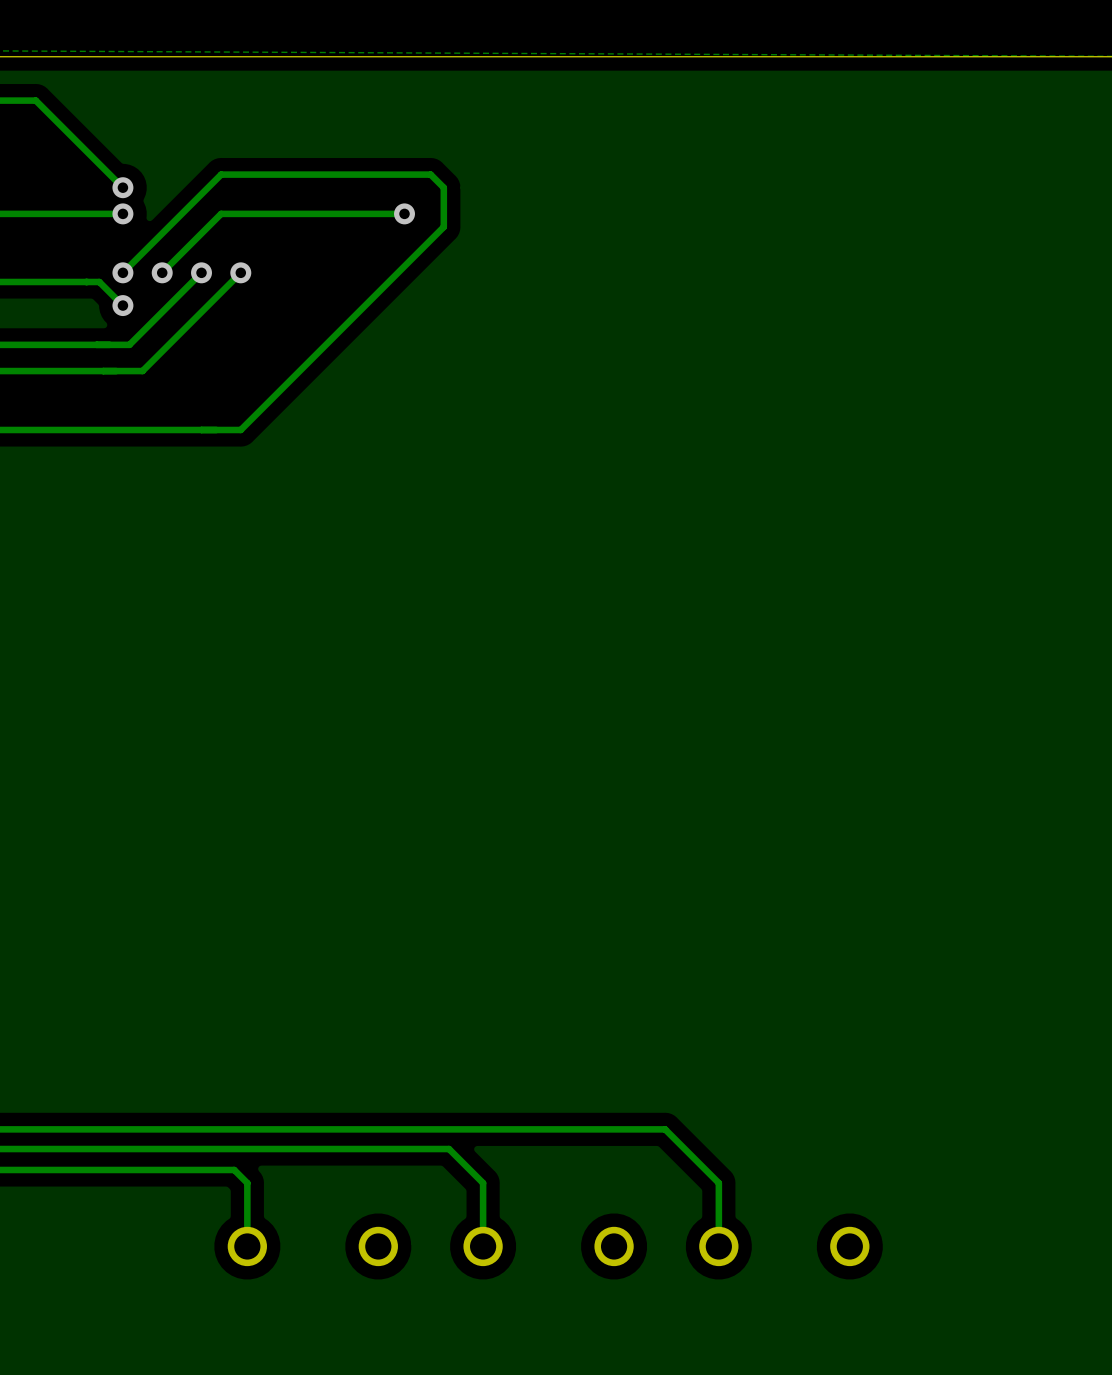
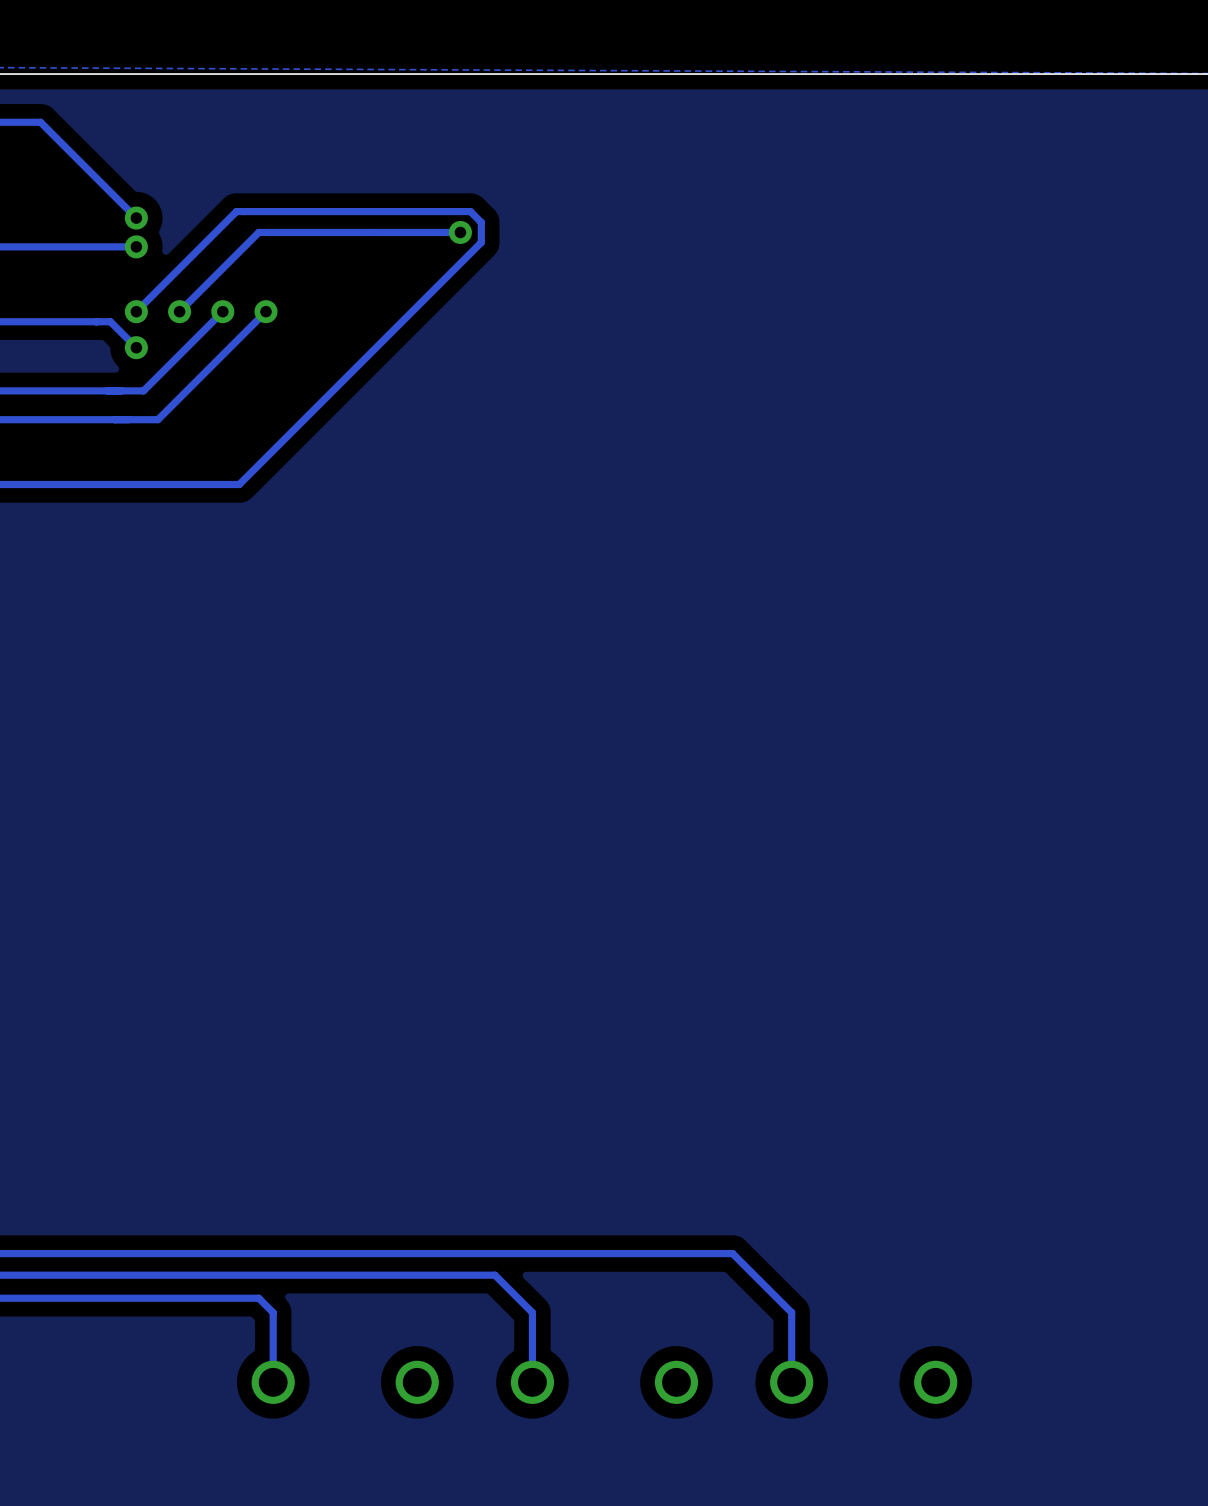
track: (213, 181) (221, 174) (430, 174) (443, 187) (443, 226) (240, 429) (216, 429) -> (236, 211) (470, 211) (481, 222) (481, 242) (239, 484)
track: (404, 213) (221, 213) -> (460, 232) (258, 232) (244, 246)
via position: (404, 213) -> (460, 232)

